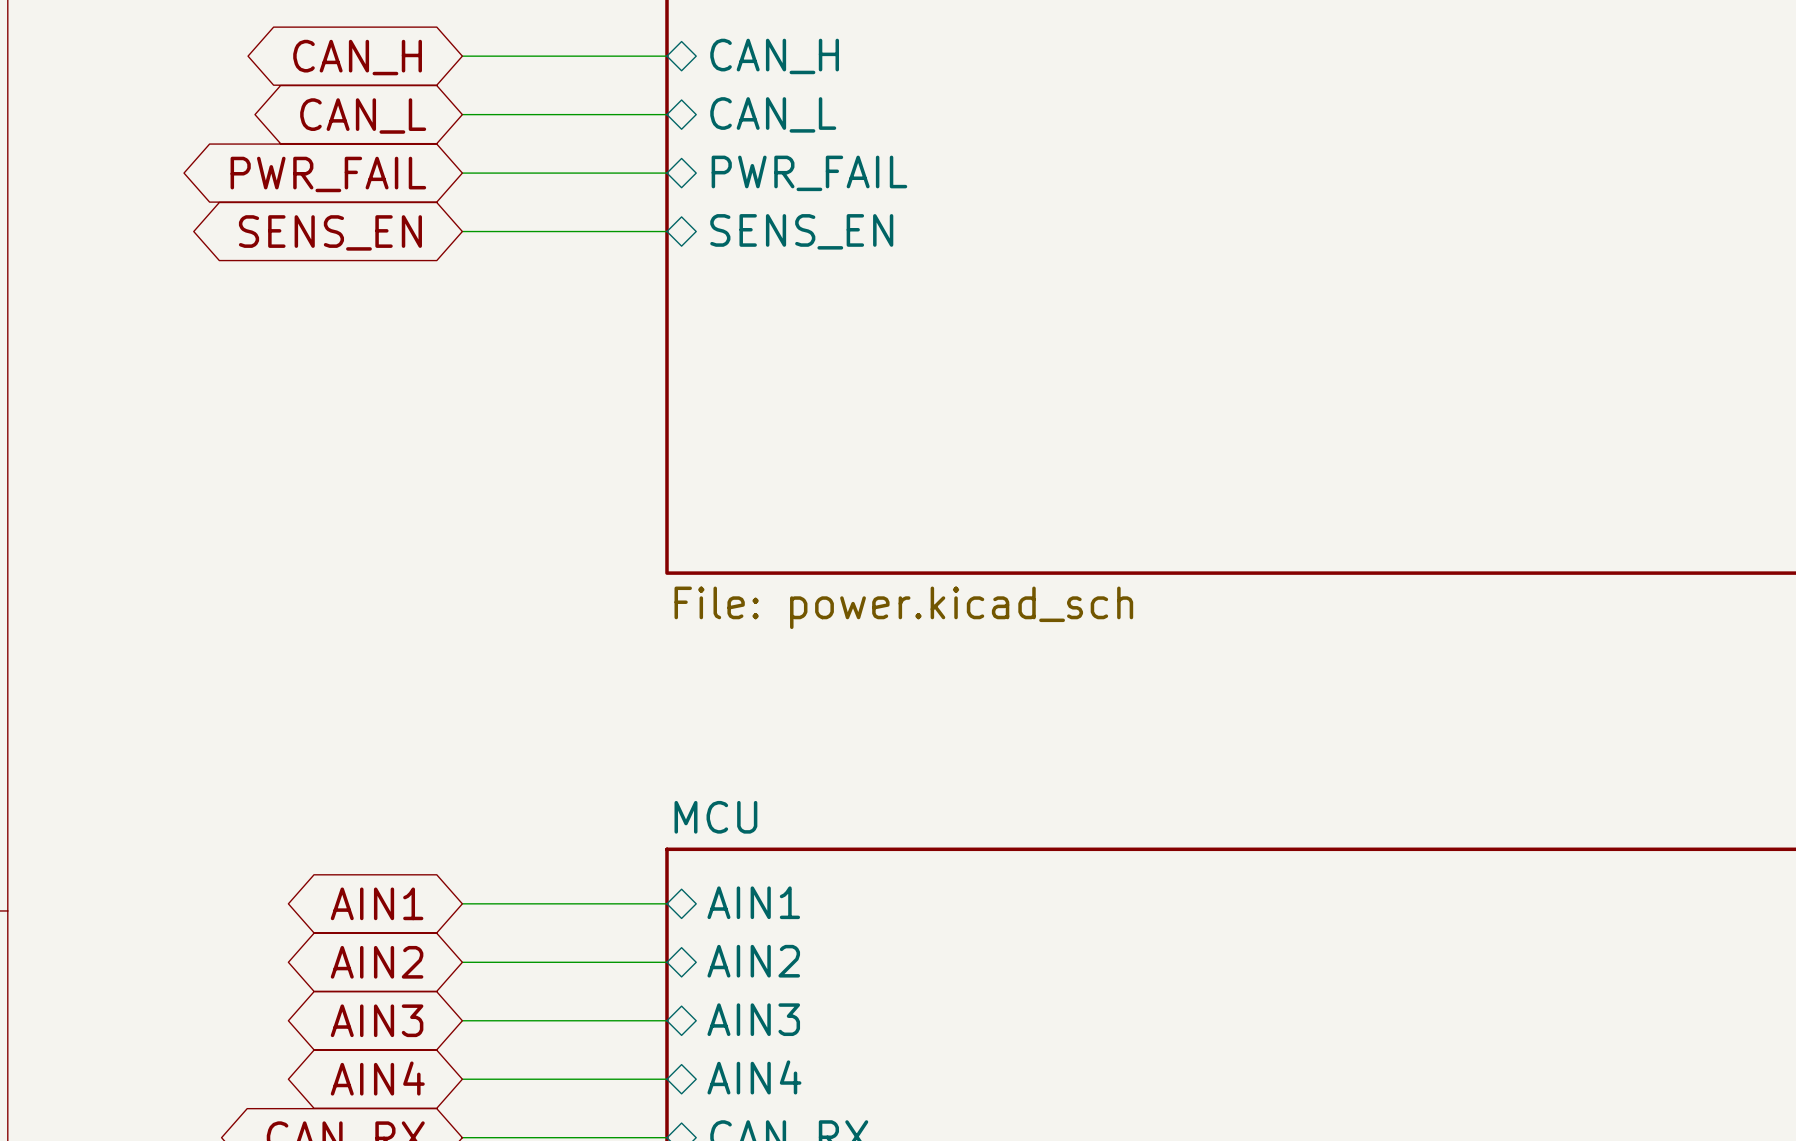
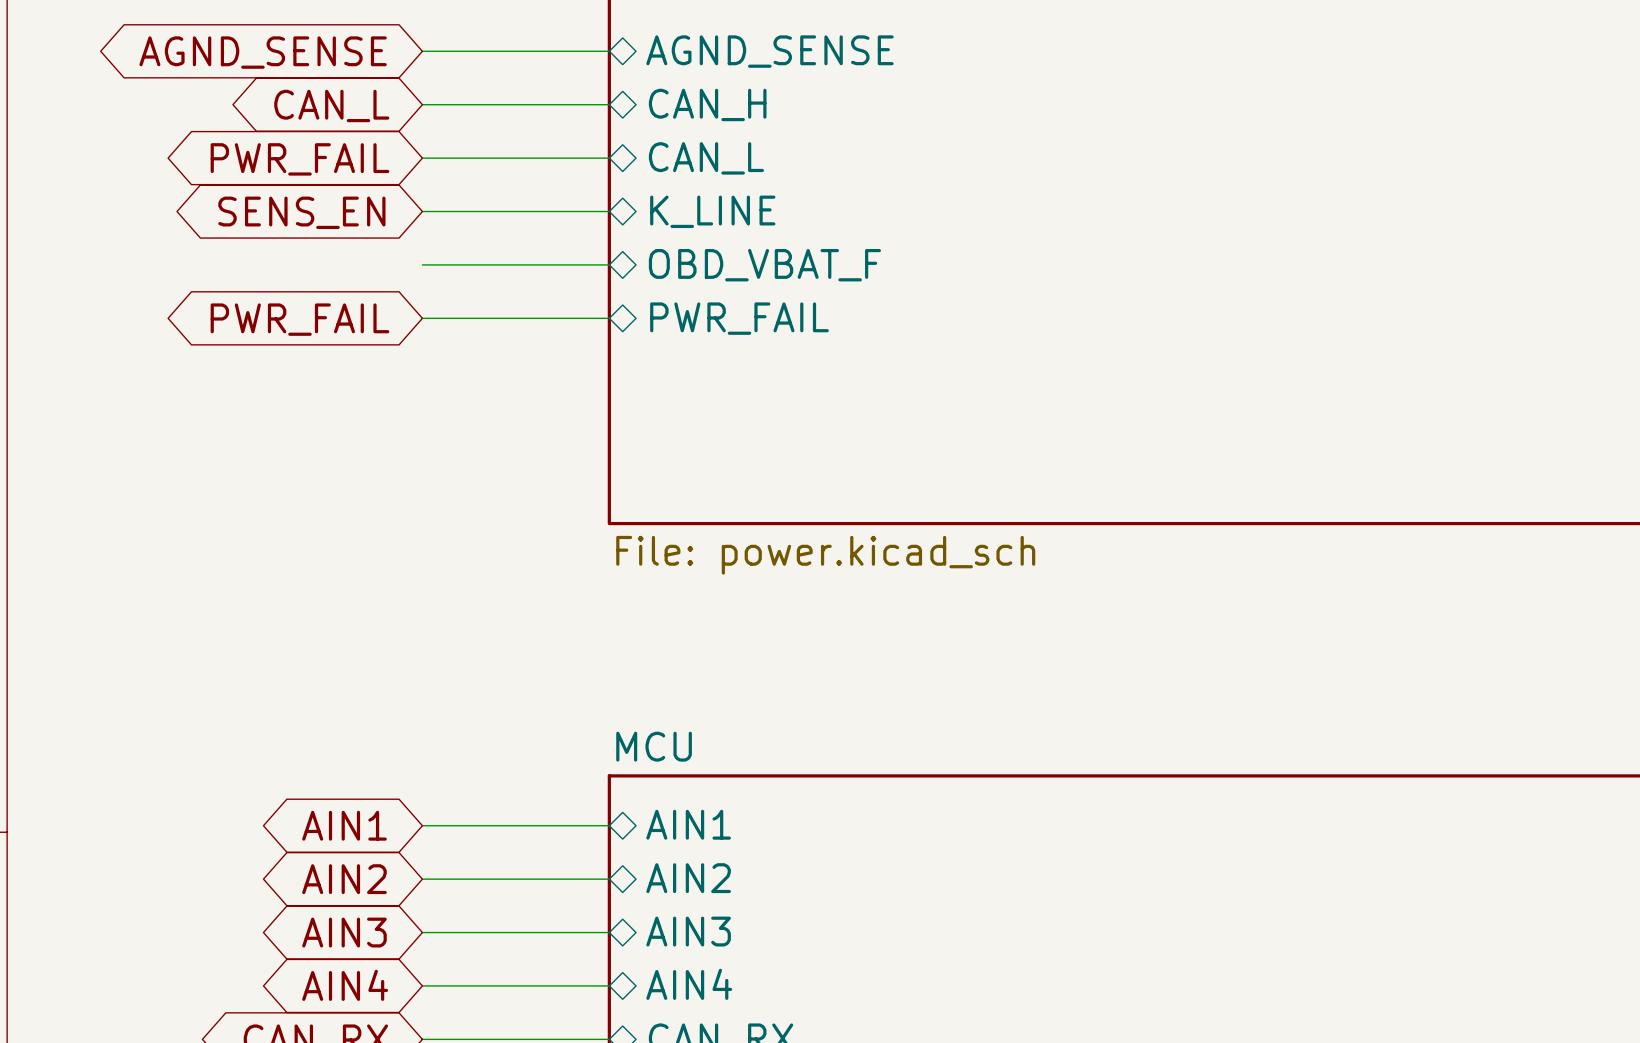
sheet pin: CAN_H (774, 56) -> AGND_SENSE (769, 51)
global label: CAN_H (357, 57) -> AGND_SENSE (263, 52)
sheet pin: CAN_L (773, 114) -> CAN_H (707, 104)
sheet pin: PWR_FAIL (809, 173) -> CAN_L (706, 158)
sheet pin: SENS_EN (801, 231) -> K_LINE (712, 211)
wire: none -> (422, 264) (609, 264)
sheet pin: none -> OBD_VBAT_F (764, 265)
wire: none -> (422, 318) (609, 318)
sheet pin: none -> PWR_FAIL (739, 318)
global label: none -> PWR_FAIL (299, 319)

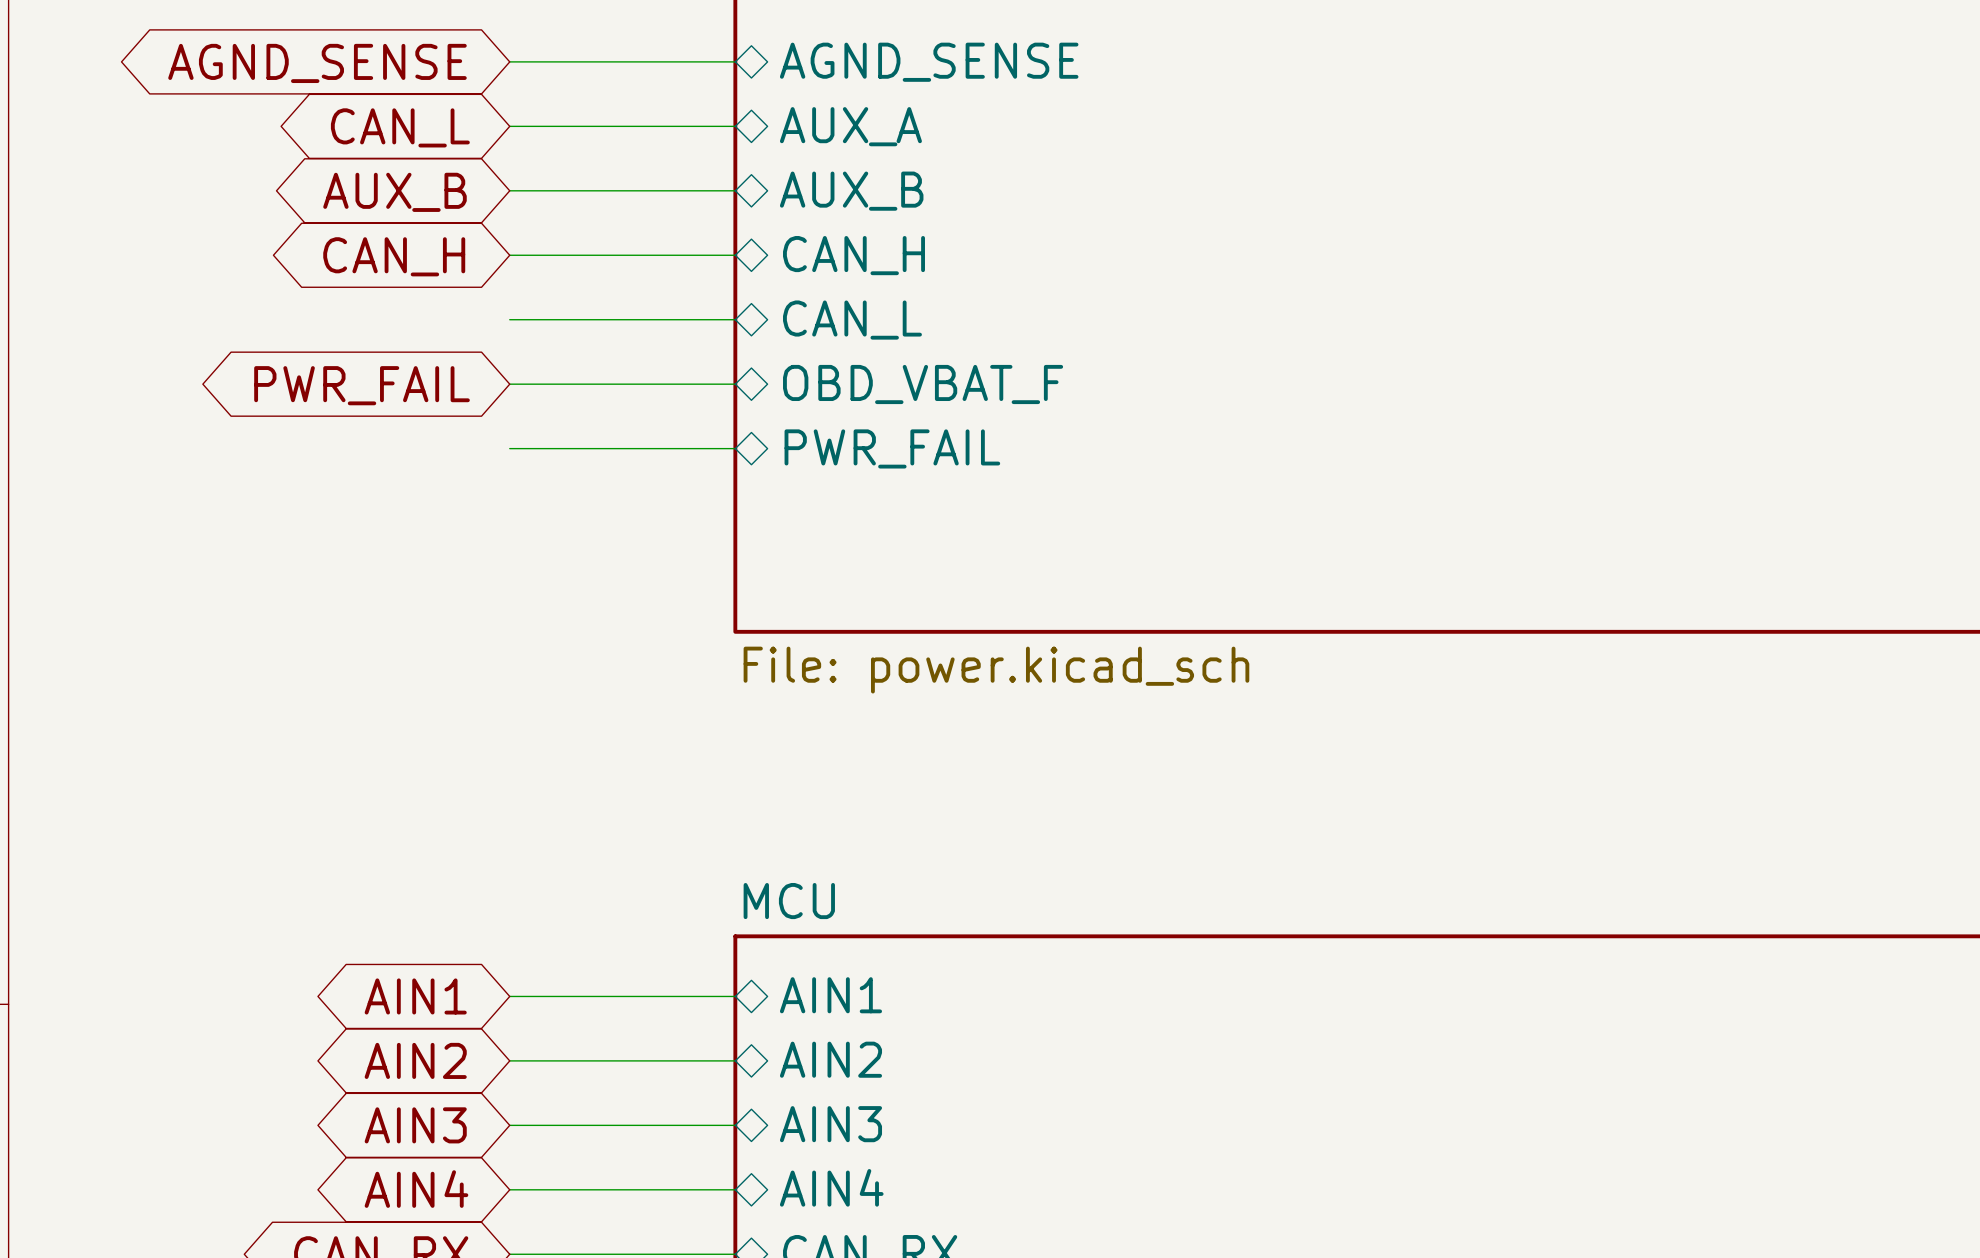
sheet pin: CAN_H (707, 104) -> AUX_A (850, 126)
sheet pin: CAN_L (706, 158) -> AUX_B (851, 191)
global label: PWR_FAIL (299, 159) -> AUX_B (394, 192)
sheet pin: K_LINE (712, 211) -> CAN_H (854, 255)
global label: SENS_EN (301, 212) -> CAN_H (394, 256)
sheet pin: OBD_VBAT_F (764, 265) -> CAN_L (852, 320)
sheet pin: PWR_FAIL (739, 318) -> OBD_VBAT_F (923, 384)
wire: none -> (509, 448) (735, 448)
sheet pin: none -> PWR_FAIL (892, 448)

